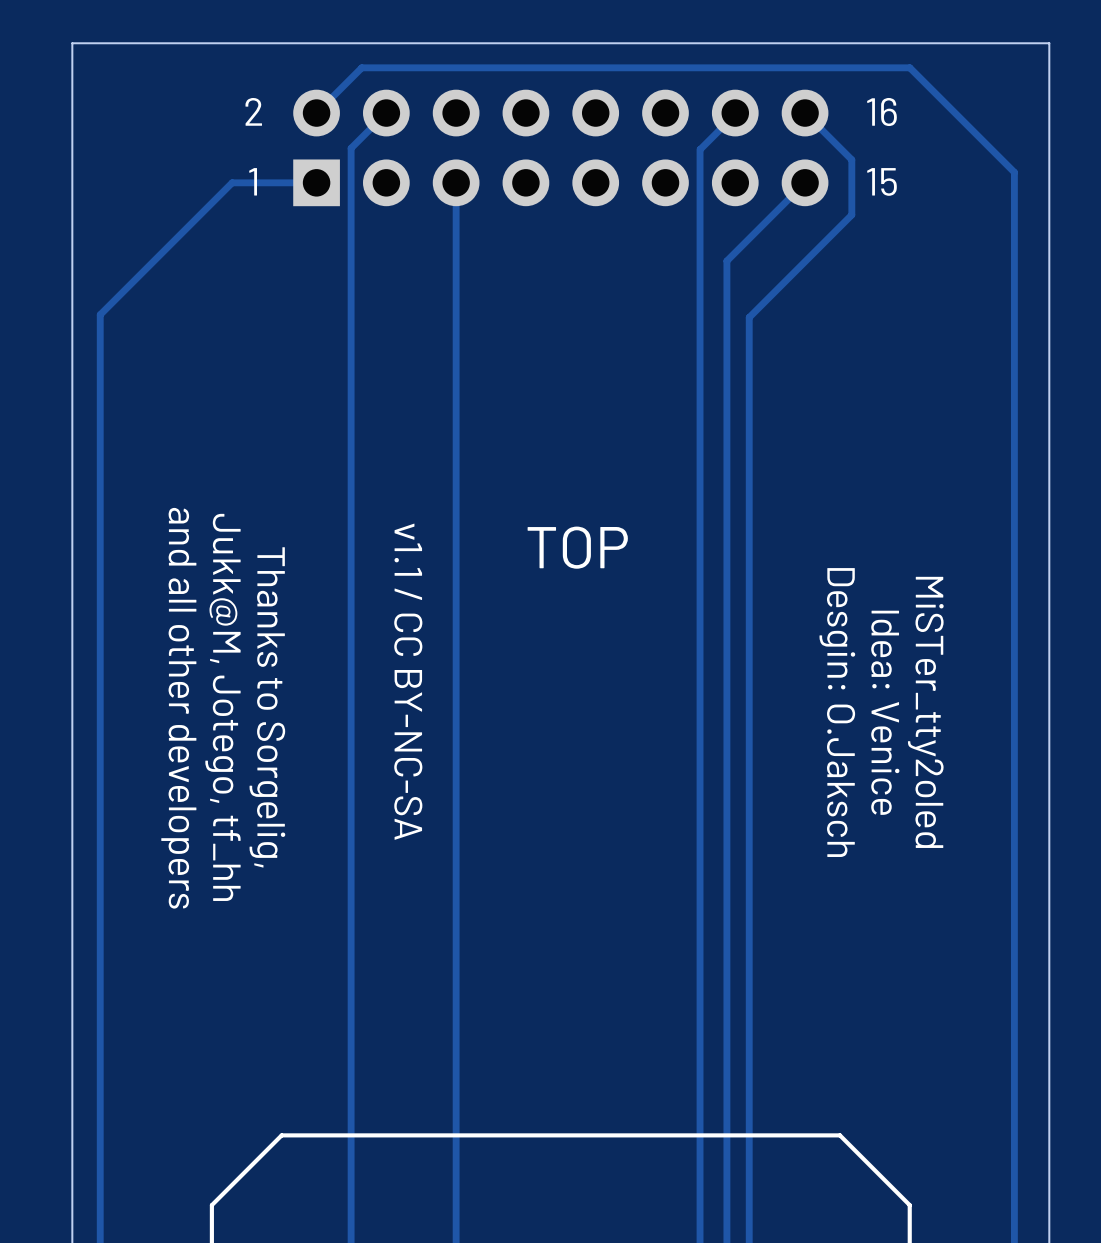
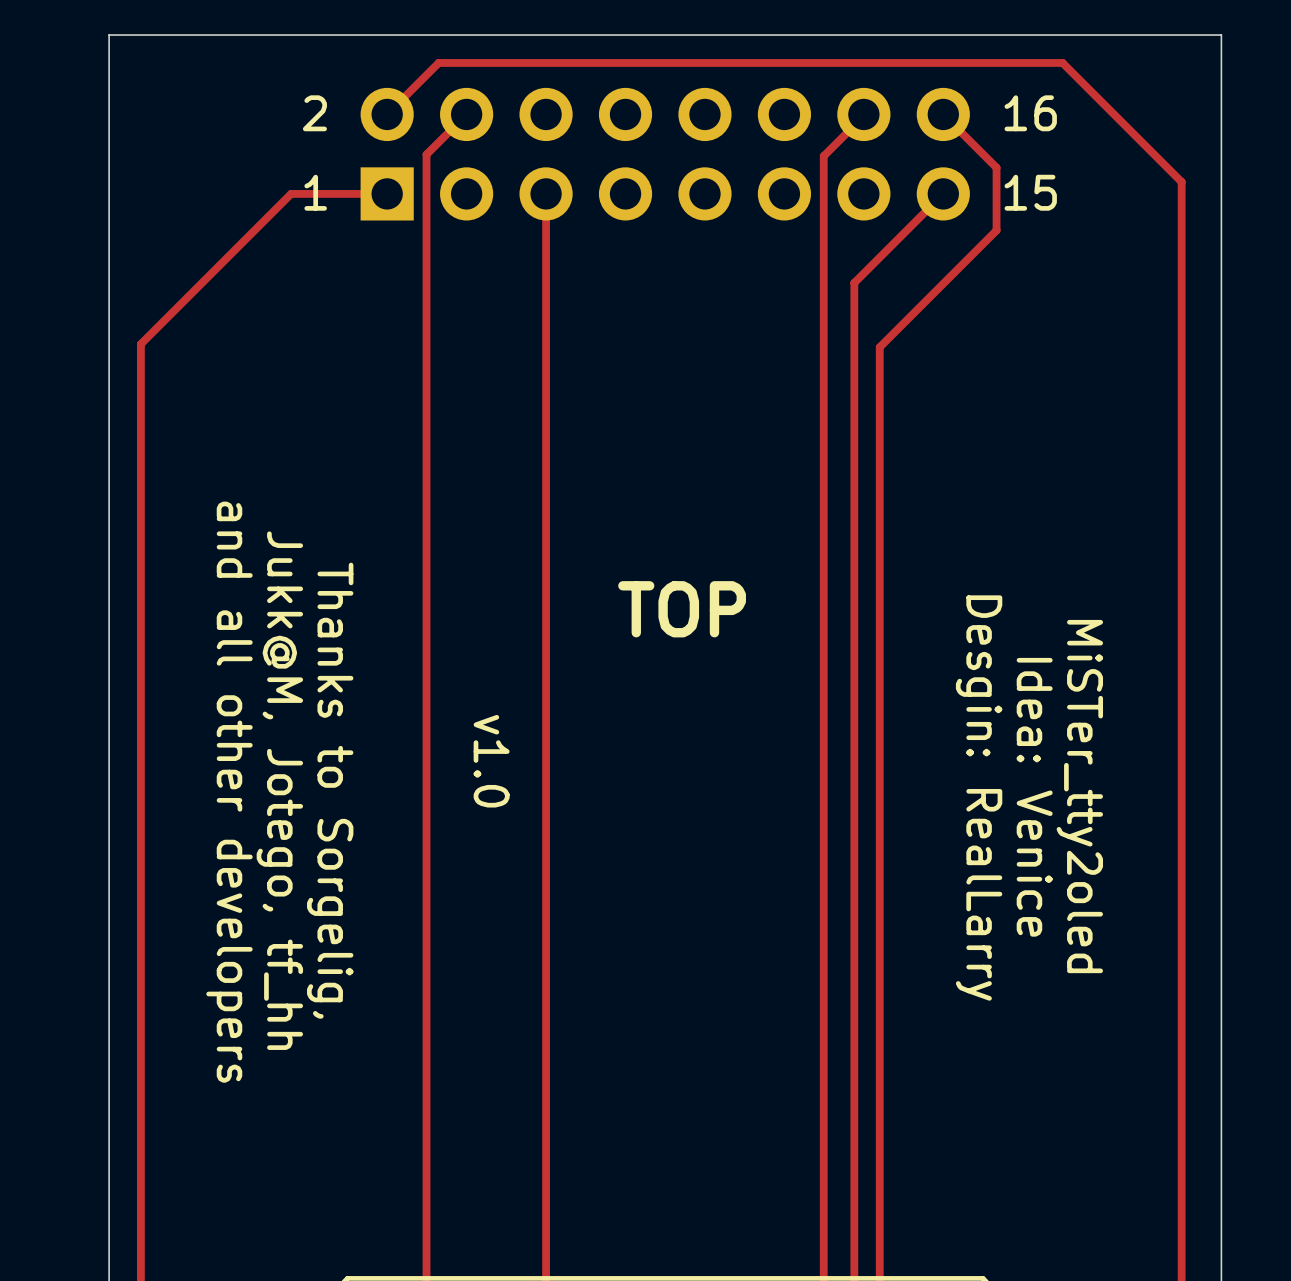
text: v1.1 / CC BY-NC-SA (408, 681) -> v1.0 (491, 761)
text: Desgin: O.Jaksch (837, 712) -> Desgin: RealLarry (979, 798)

